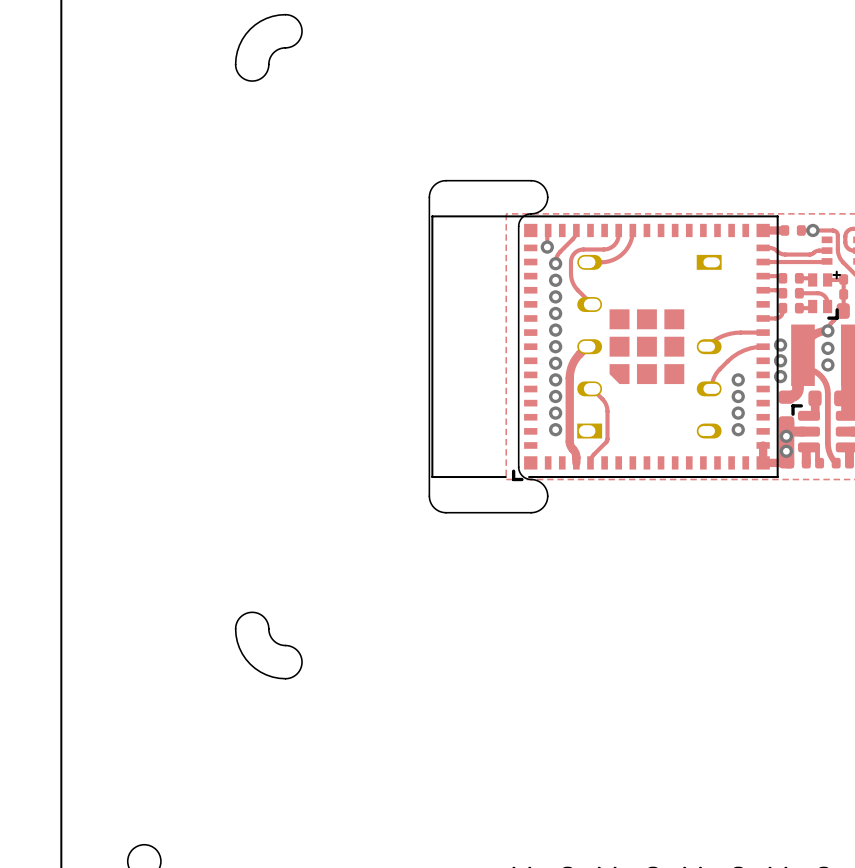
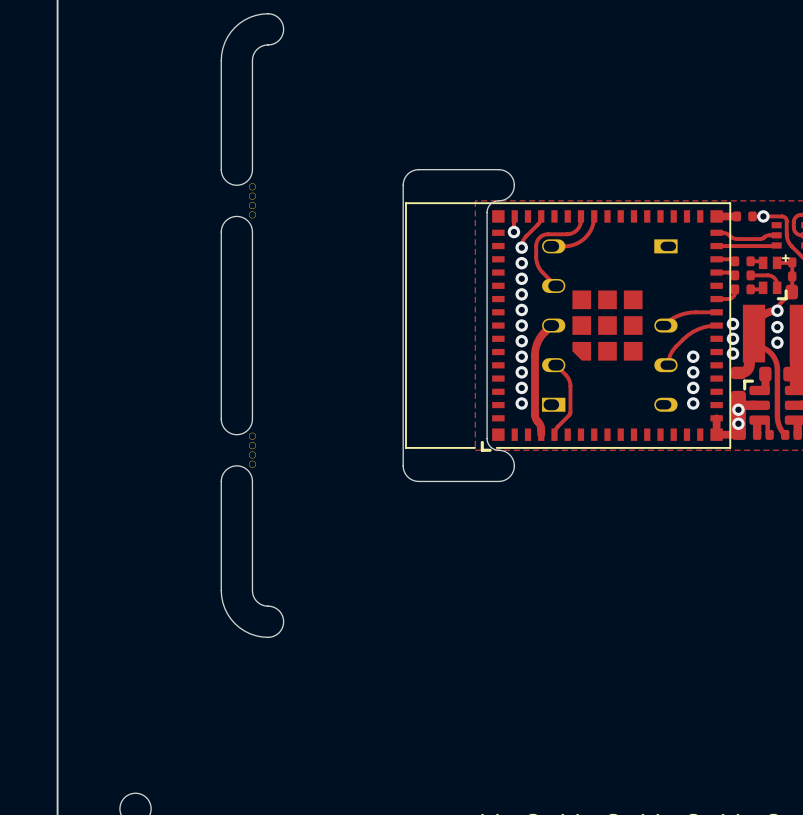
board edge: (235, 64) (240, 76) (252, 81) (263, 76) (268, 64) -> (221, 60) (221, 169)
board edge: none -> (252, 60) (252, 169)
part: none -> (238, 200)
board edge: none -> (221, 232) (221, 419)
board edge: none -> (252, 232) (252, 419)
part: none -> (238, 450)
board edge: none -> (252, 481) (252, 590)
board edge: (235, 628) (240, 617) (252, 612) (263, 617) (268, 628) -> (221, 590) (221, 481)

